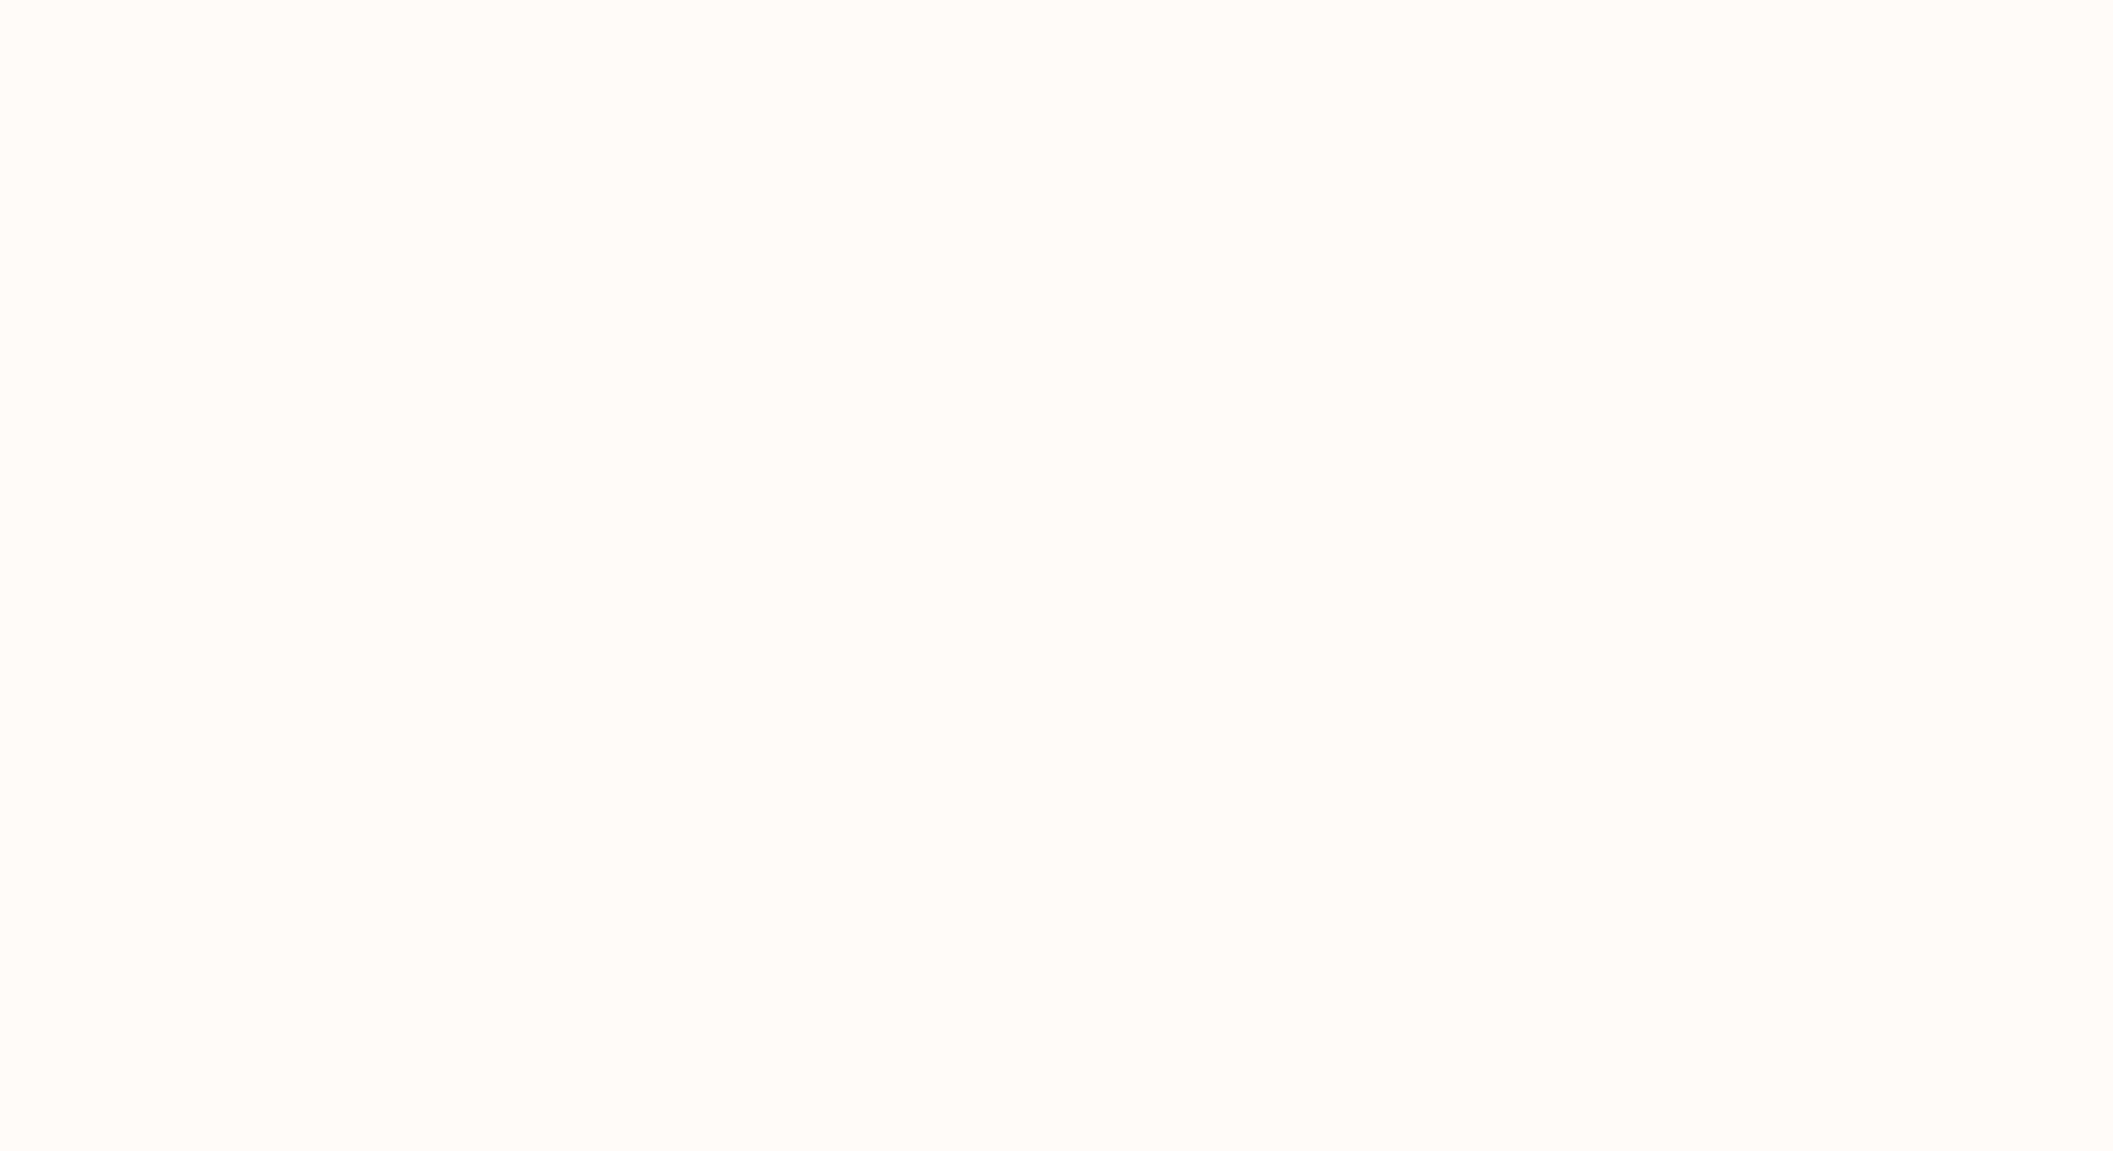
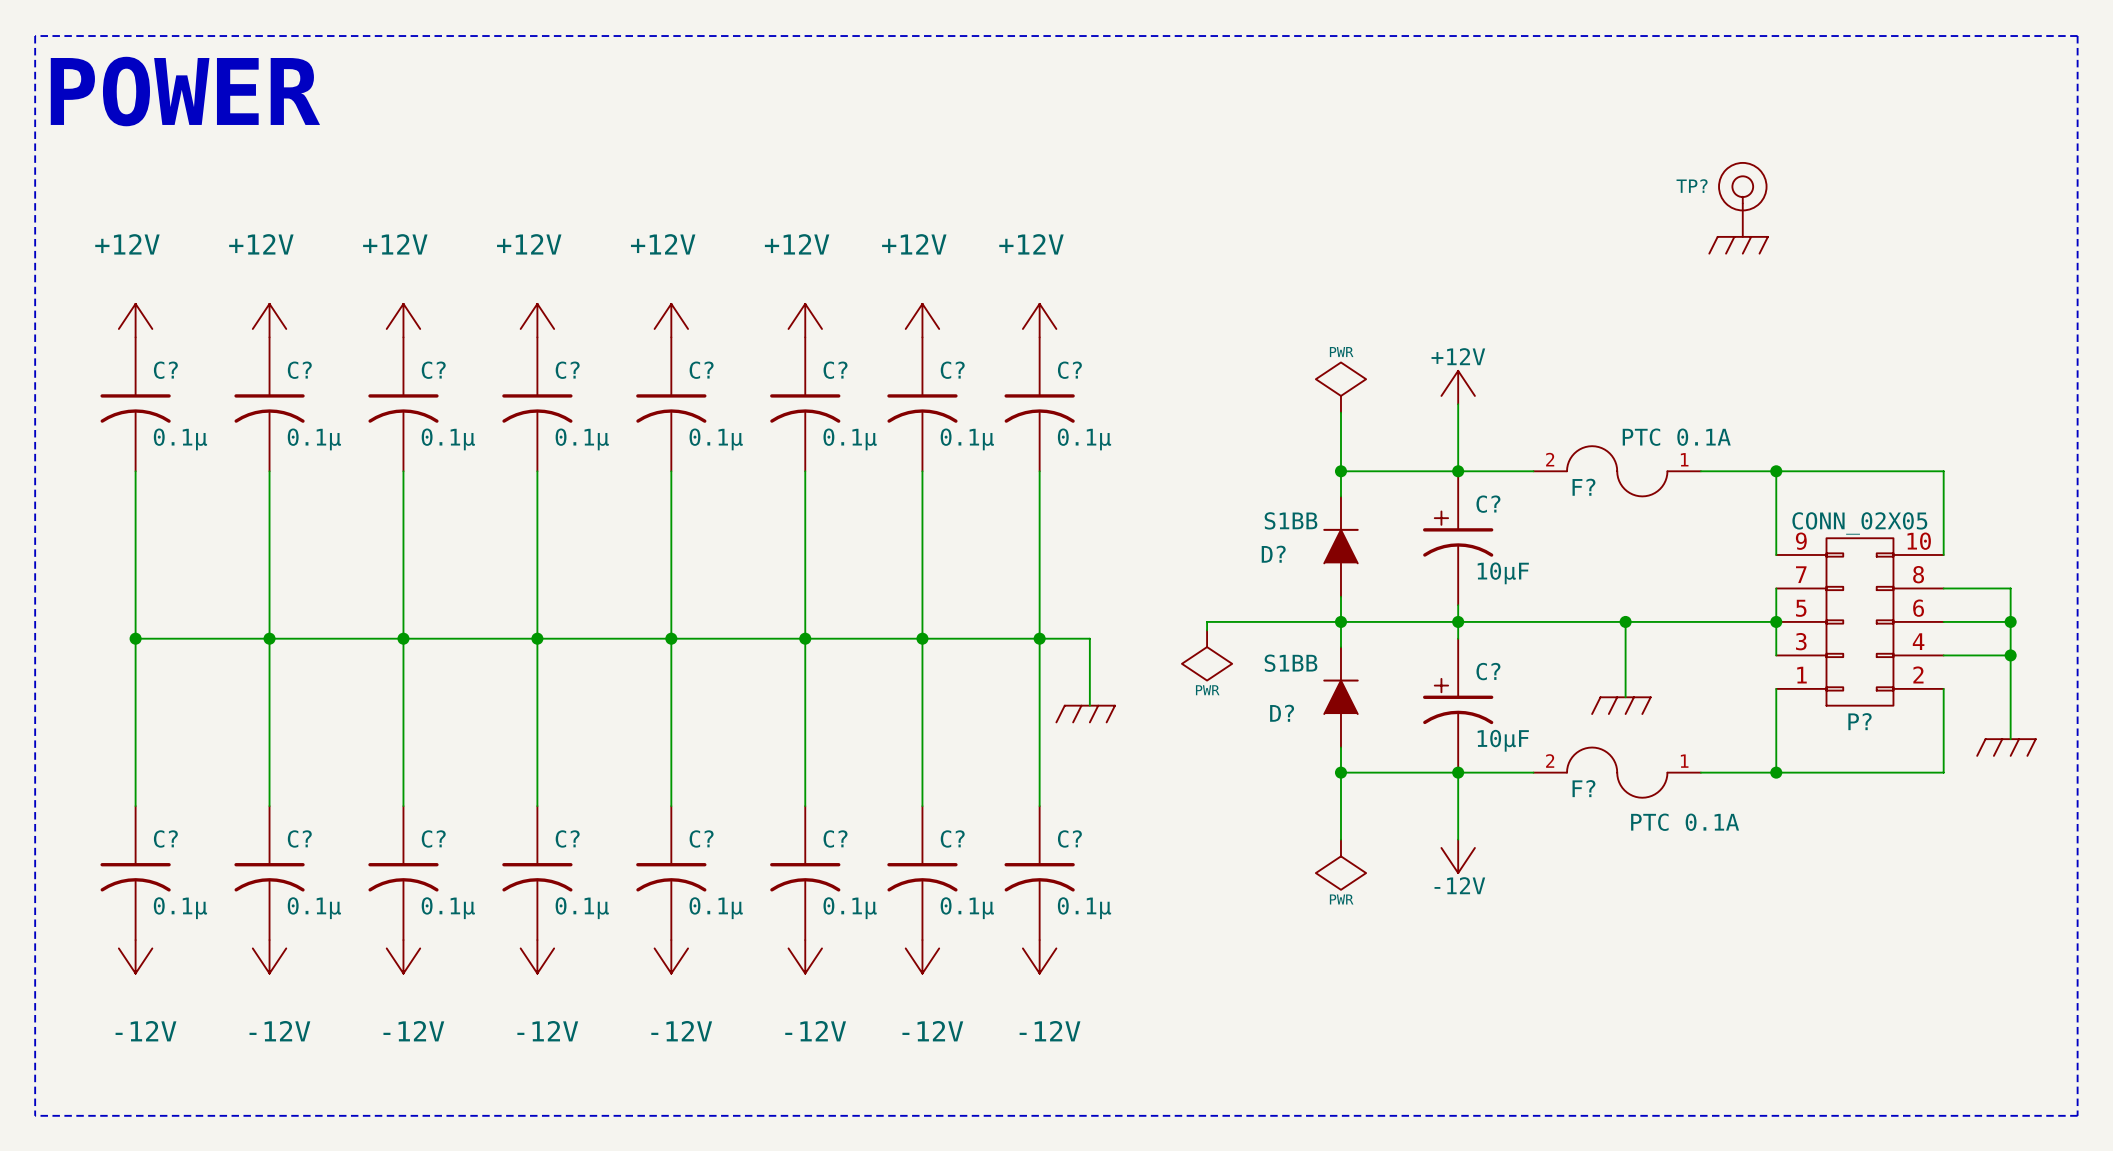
line: none -> (35, 36) (35, 1115) (2077, 1115) (2077, 36) (35, 36)
text: none -> POWER (185, 91)
TP?: none -> (1742, 199)
power symbol: none -> (1738, 245)
power symbol: none -> +12V (135, 320)
power symbol: none -> +12V (269, 320)
power symbol: none -> +12V (403, 320)
power symbol: none -> +12V (537, 320)
power symbol: none -> +12V (671, 320)
power symbol: none -> +12V (805, 320)
power symbol: none -> +12V (922, 320)
power symbol: none -> +12V (1039, 320)
power symbol: none -> PWR (1340, 387)
power symbol: none -> +12V (1458, 387)
C?: none -> 0.1µ (135, 404)
C?: none -> 0.1µ (269, 404)
C?: none -> 0.1µ (403, 404)
C?: none -> 0.1µ (537, 404)
C?: none -> 0.1µ (671, 404)
C?: none -> 0.1µ (805, 404)
C?: none -> 0.1µ (922, 404)
C?: none -> 0.1µ (1039, 404)
wire: none -> (1458, 404) (1458, 471)
wire: none -> (1340, 412) (1340, 496)
wire: none -> (135, 471) (135, 806)
wire: none -> (269, 471) (269, 806)
wire: none -> (403, 471) (403, 806)
wire: none -> (537, 471) (537, 806)
wire: none -> (671, 471) (671, 806)
wire: none -> (805, 471) (805, 806)
wire: none -> (922, 471) (922, 806)
wire: none -> (1039, 471) (1039, 806)
wire: none -> (1340, 471) (1533, 471)
junction: none -> (1340, 471)
junction: none -> (1458, 471)
F?: none -> PTC 0.1A (1617, 471)
wire: none -> (1700, 471) (1943, 471) (1943, 554)
wire: none -> (1776, 471) (1776, 554)
junction: none -> (1776, 471)
C?: none -> 10μF (1458, 538)
D?: none -> S1BB (1340, 546)
wire: none -> (1776, 588) (1776, 655)
wire: none -> (1943, 588) (2010, 588) (2010, 739)
wire: none -> (1340, 596) (1340, 647)
wire: none -> (1458, 605) (1458, 638)
junction: none -> (1340, 621)
junction: none -> (1458, 621)
wire: none -> (1625, 621) (1625, 697)
junction: none -> (1625, 621)
wire: none -> (1776, 621) (1207, 621) (1207, 630)
junction: none -> (1776, 621)
P?: none -> CONN_02X05 (1859, 621)
wire: none -> (1943, 621) (2010, 621)
junction: none -> (2010, 621)
wire: none -> (135, 638) (1089, 638) (1089, 705)
junction: none -> (135, 638)
junction: none -> (269, 638)
junction: none -> (403, 638)
junction: none -> (537, 638)
junction: none -> (671, 638)
junction: none -> (805, 638)
junction: none -> (922, 638)
junction: none -> (1039, 638)
power symbol: none -> PWR (1207, 655)
wire: none -> (1943, 655) (2010, 655)
junction: none -> (2010, 655)
wire: none -> (1776, 688) (1776, 772)
wire: none -> (1943, 688) (1943, 772) (1700, 772)
D?: none -> S1BB (1340, 697)
C?: none -> 10μF (1458, 705)
power symbol: none -> (1621, 705)
power symbol: none -> (1085, 714)
wire: none -> (1340, 747) (1340, 839)
power symbol: none -> (2006, 747)
wire: none -> (1340, 772) (1533, 772)
junction: none -> (1340, 772)
wire: none -> (1458, 772) (1458, 839)
junction: none -> (1458, 772)
F?: none -> PTC 0.1A (1617, 772)
junction: none -> (1776, 772)
power symbol: none -> -12V (1458, 856)
power symbol: none -> PWR (1340, 864)
C?: none -> 0.1µ (135, 873)
C?: none -> 0.1µ (269, 873)
C?: none -> 0.1µ (403, 873)
C?: none -> 0.1µ (537, 873)
C?: none -> 0.1µ (671, 873)
C?: none -> 0.1µ (805, 873)
C?: none -> 0.1µ (922, 873)
C?: none -> 0.1µ (1039, 873)
power symbol: none -> -12V (135, 956)
power symbol: none -> -12V (269, 956)
power symbol: none -> -12V (403, 956)
power symbol: none -> -12V (537, 956)
power symbol: none -> -12V (671, 956)
power symbol: none -> -12V (805, 956)
power symbol: none -> -12V (922, 956)
power symbol: none -> -12V (1039, 956)

